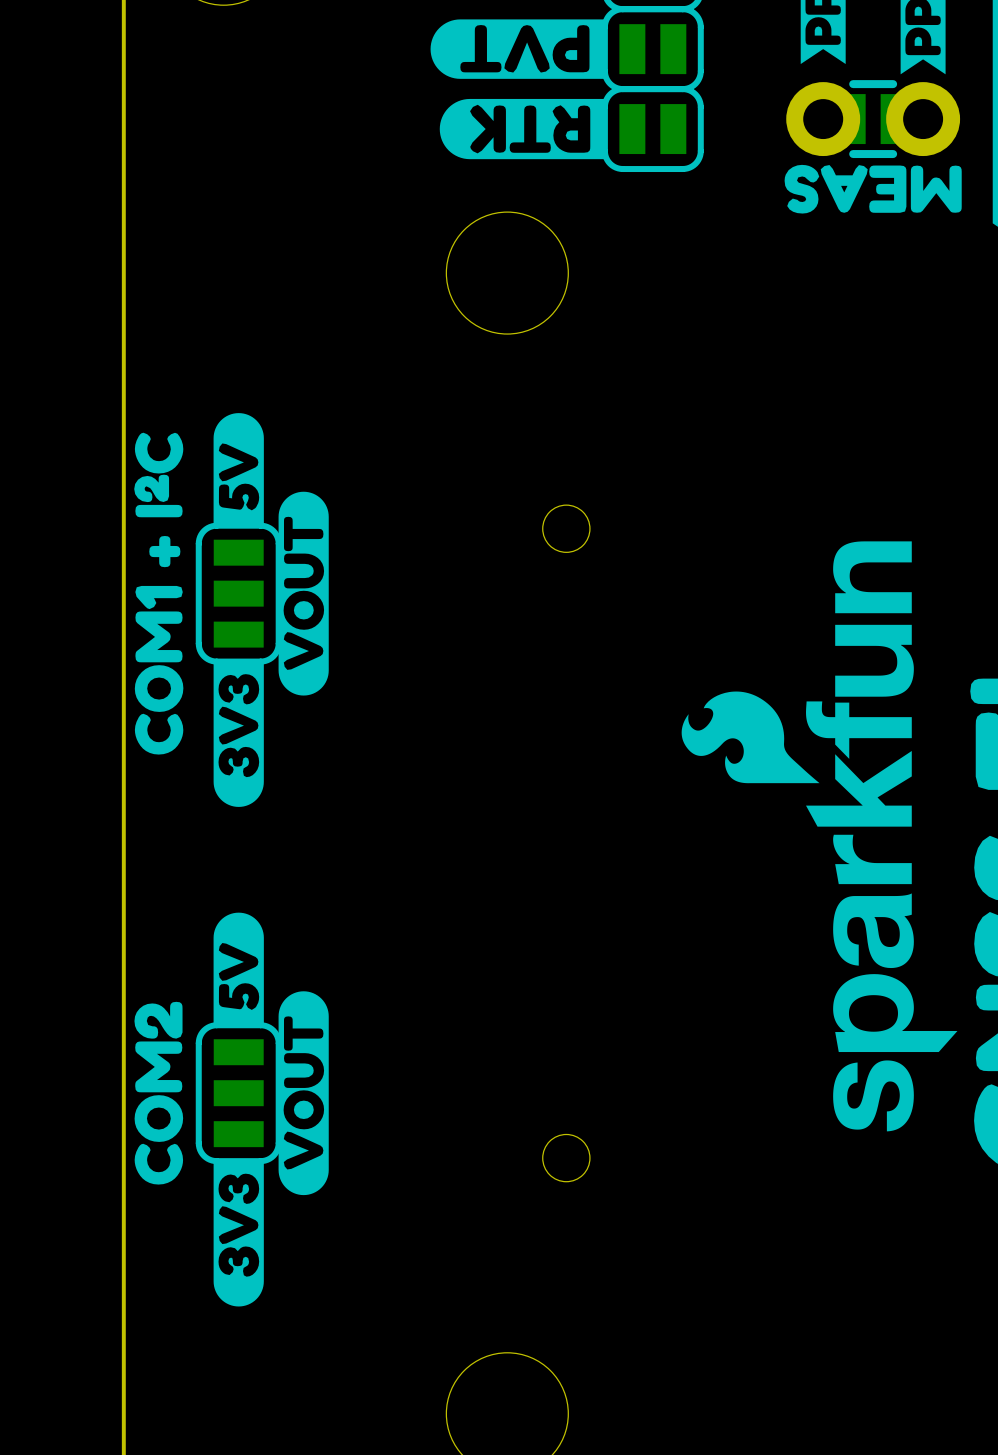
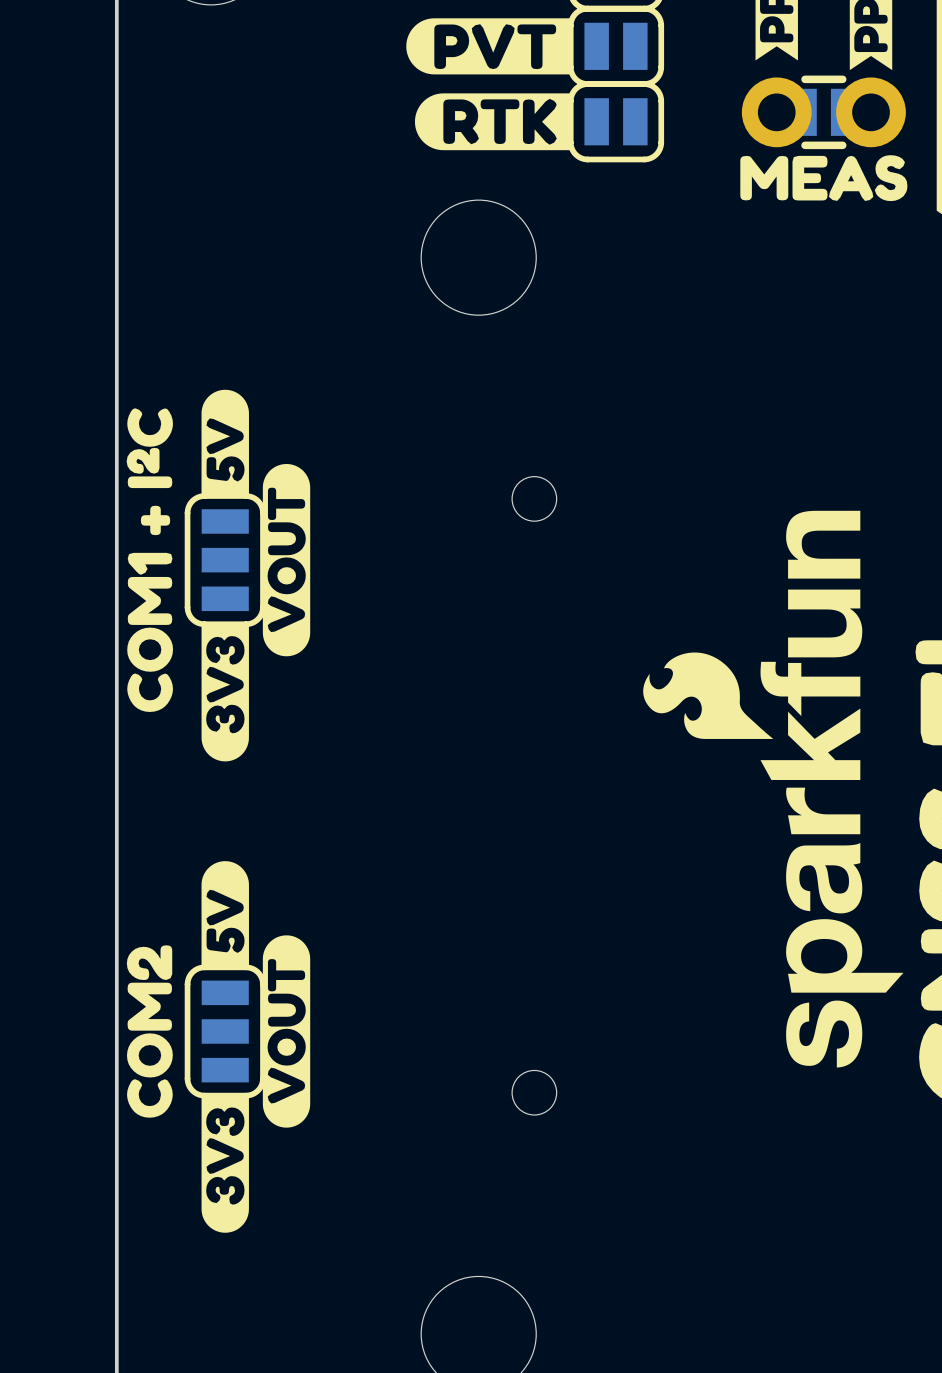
drawing shape: [430, 19, 607, 79] -> [406, 18, 573, 75]
drawing shape: [439, 98, 608, 160] -> [414, 93, 573, 151]
drawing shape: [784, 164, 962, 214] -> [740, 155, 908, 202]

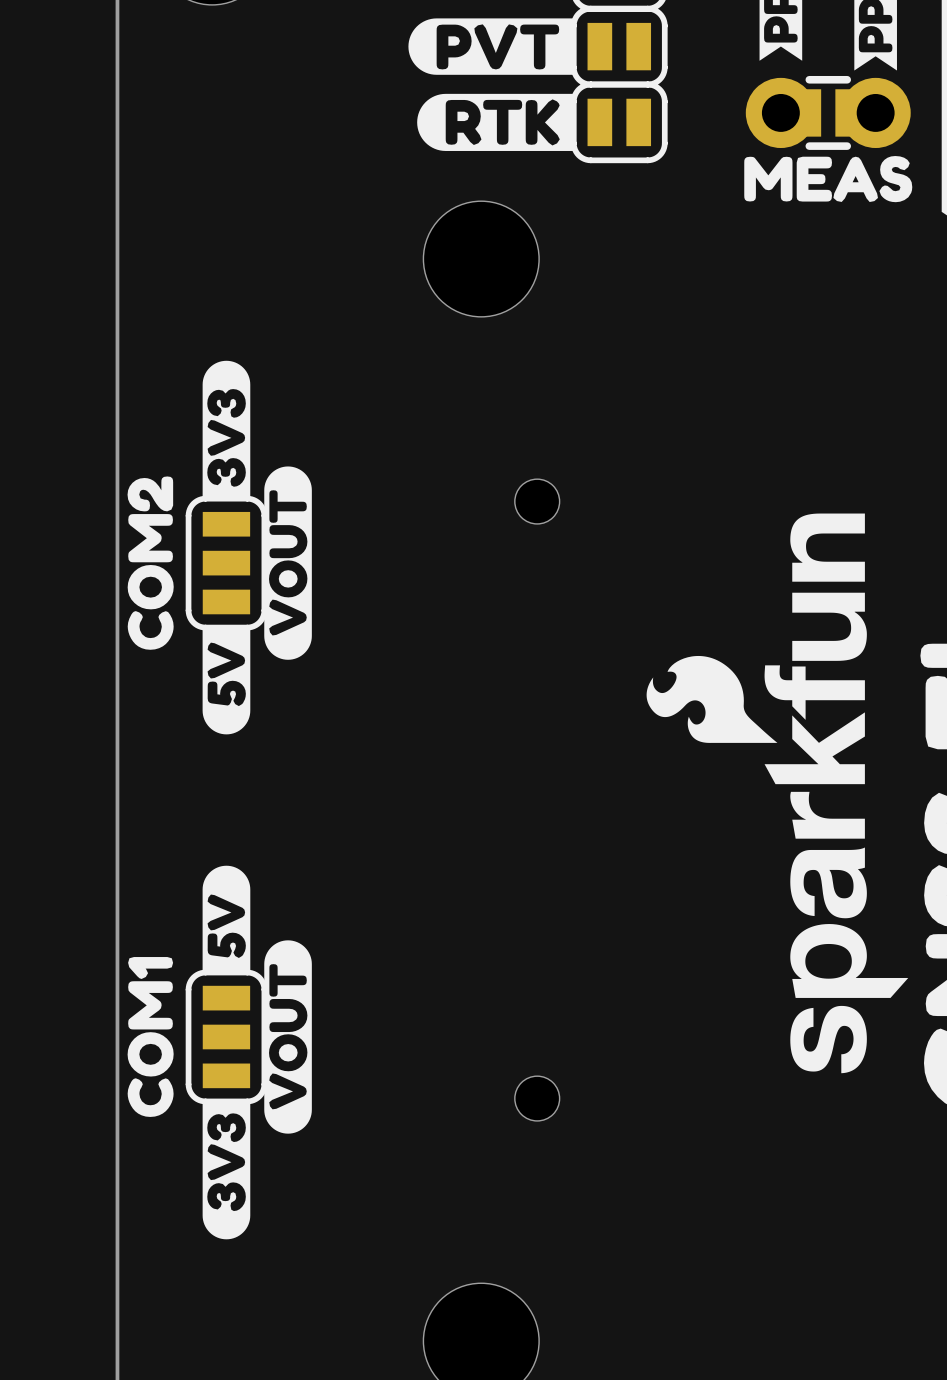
drawing shape: [201, 389, 249, 495] -> [202, 360, 251, 501]
drawing: [126, 408, 174, 712] -> none
drawing shape: [201, 622, 249, 762] -> [202, 628, 251, 735]
drawing: none -> [127, 957, 174, 1117]
drawing position: (149, 1031) -> (150, 563)

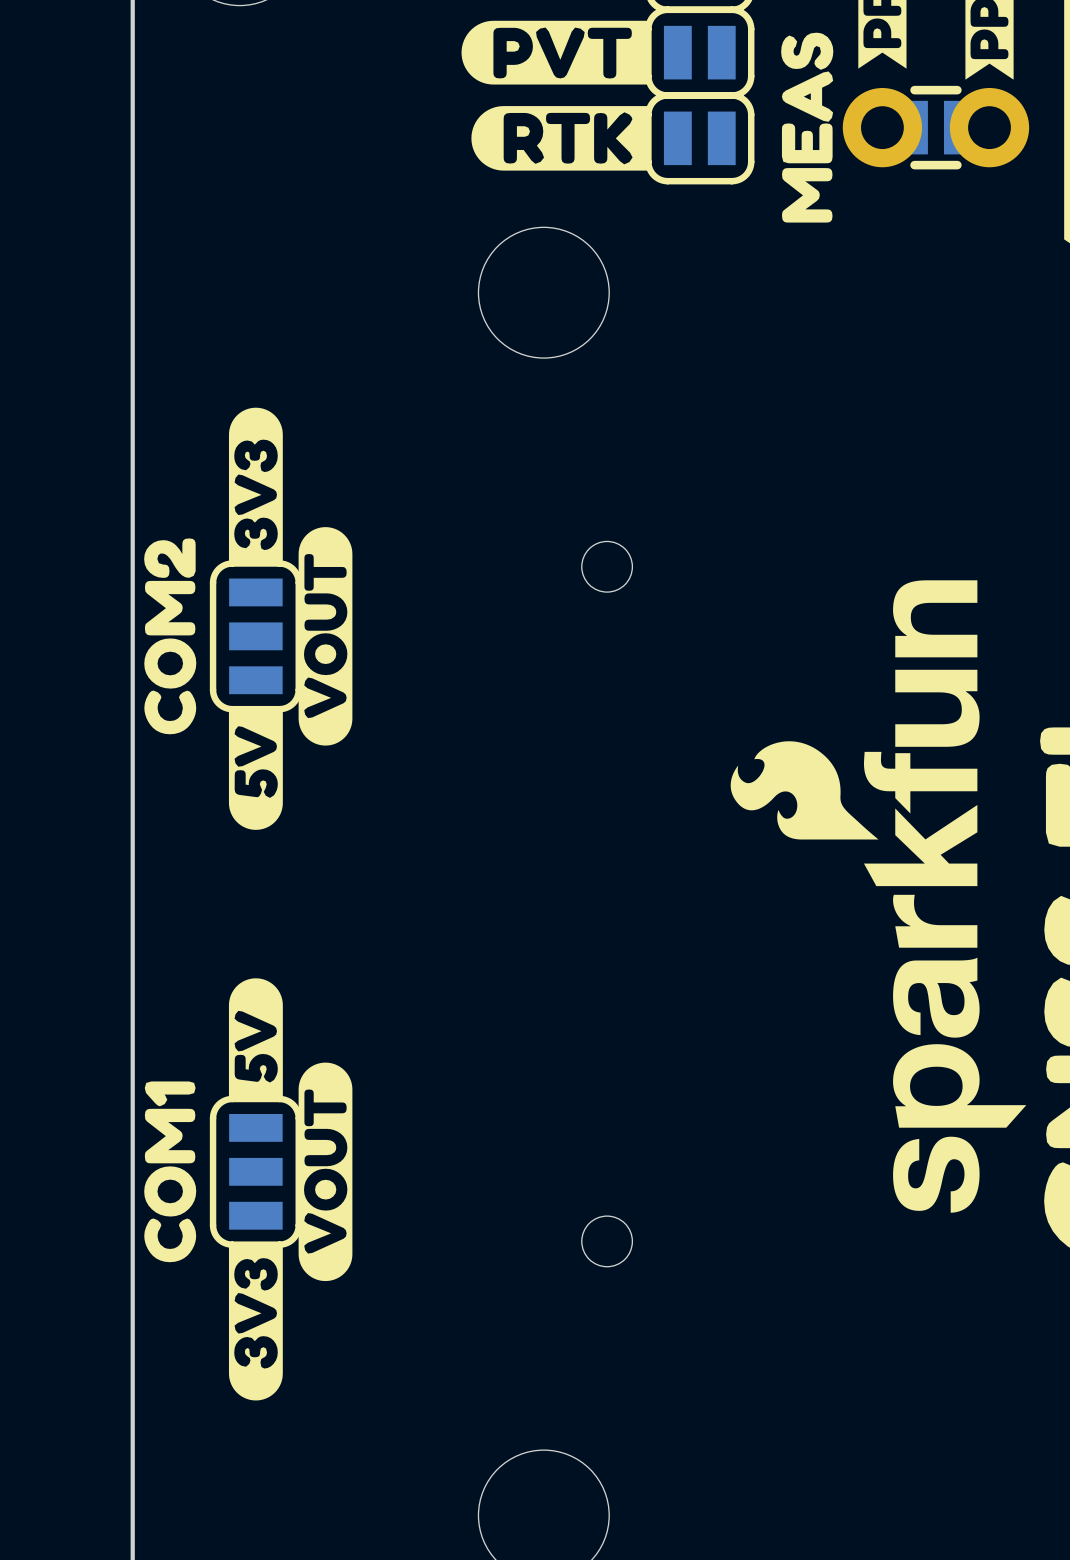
drawing: none -> [781, 32, 834, 223]
drawing: [744, 156, 913, 203] -> none

